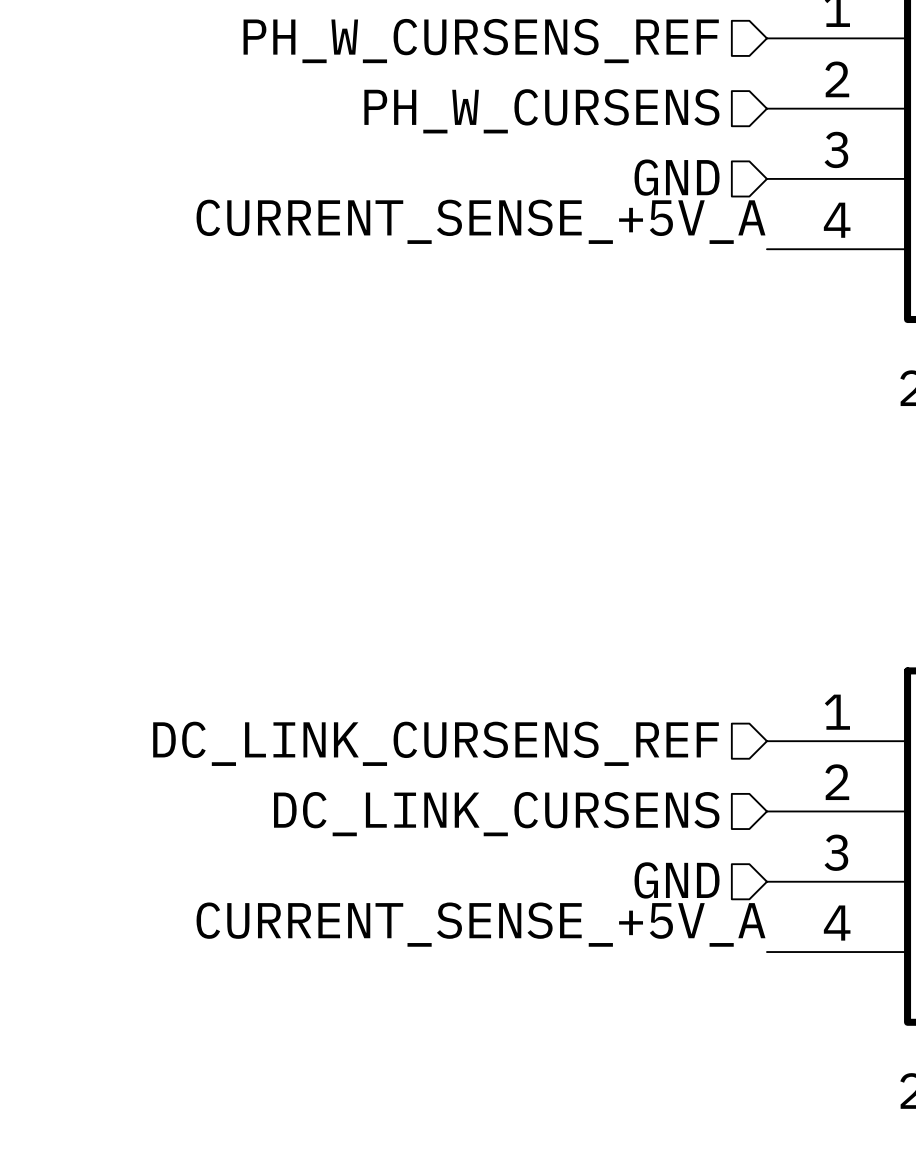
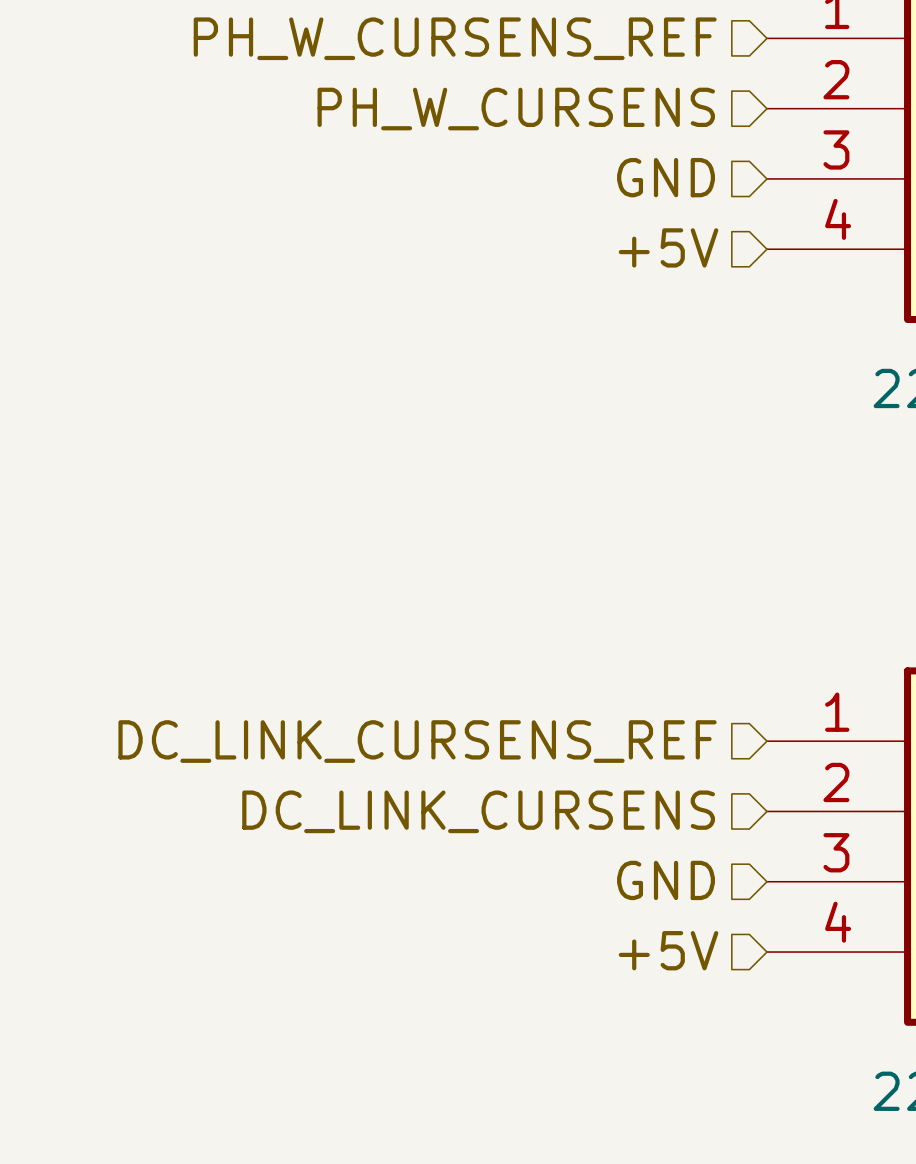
label: CURRENT_SENSE_+5V_A (481, 221) -> none
hierarchical label: none -> +5V (668, 247)
label: CURRENT_SENSE_+5V_A (481, 924) -> none
hierarchical label: none -> +5V (668, 950)

